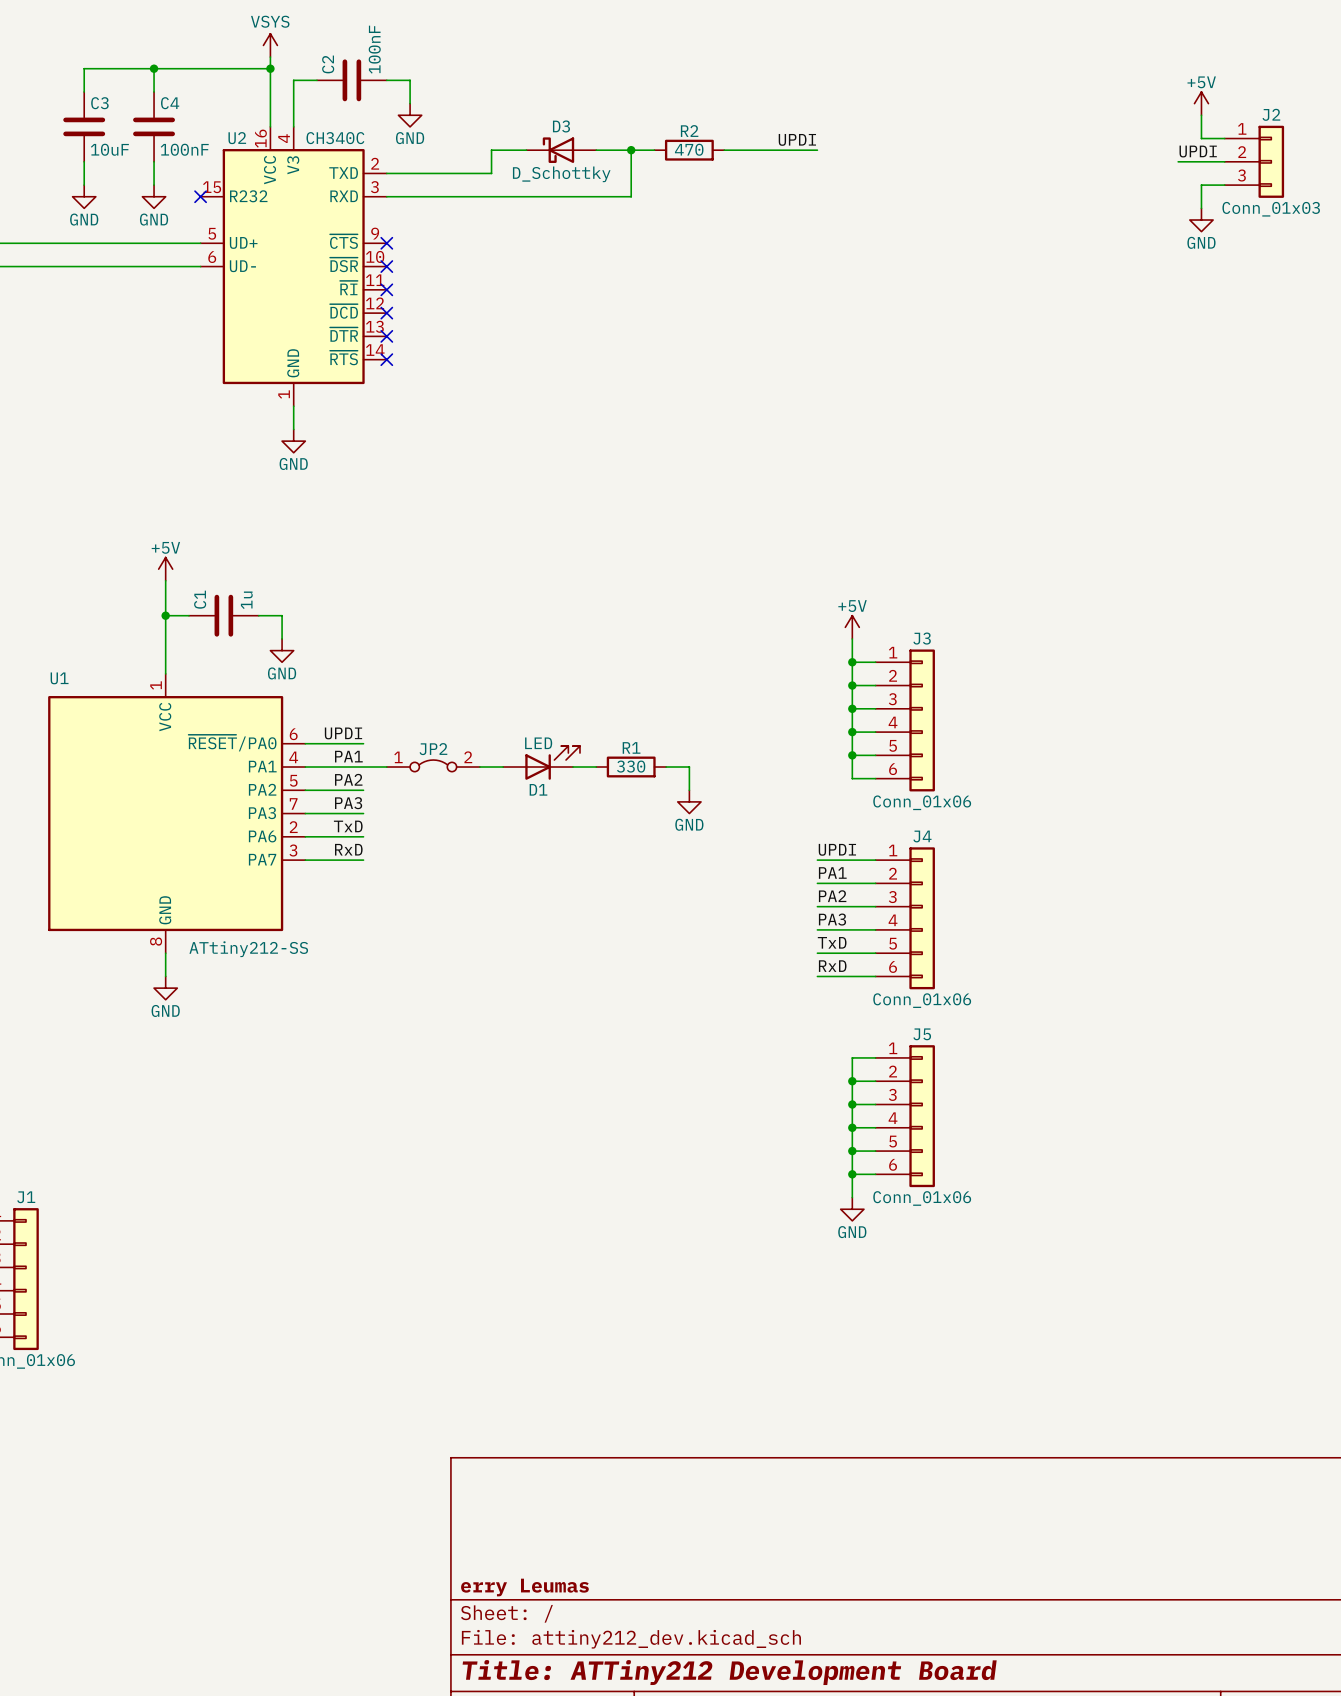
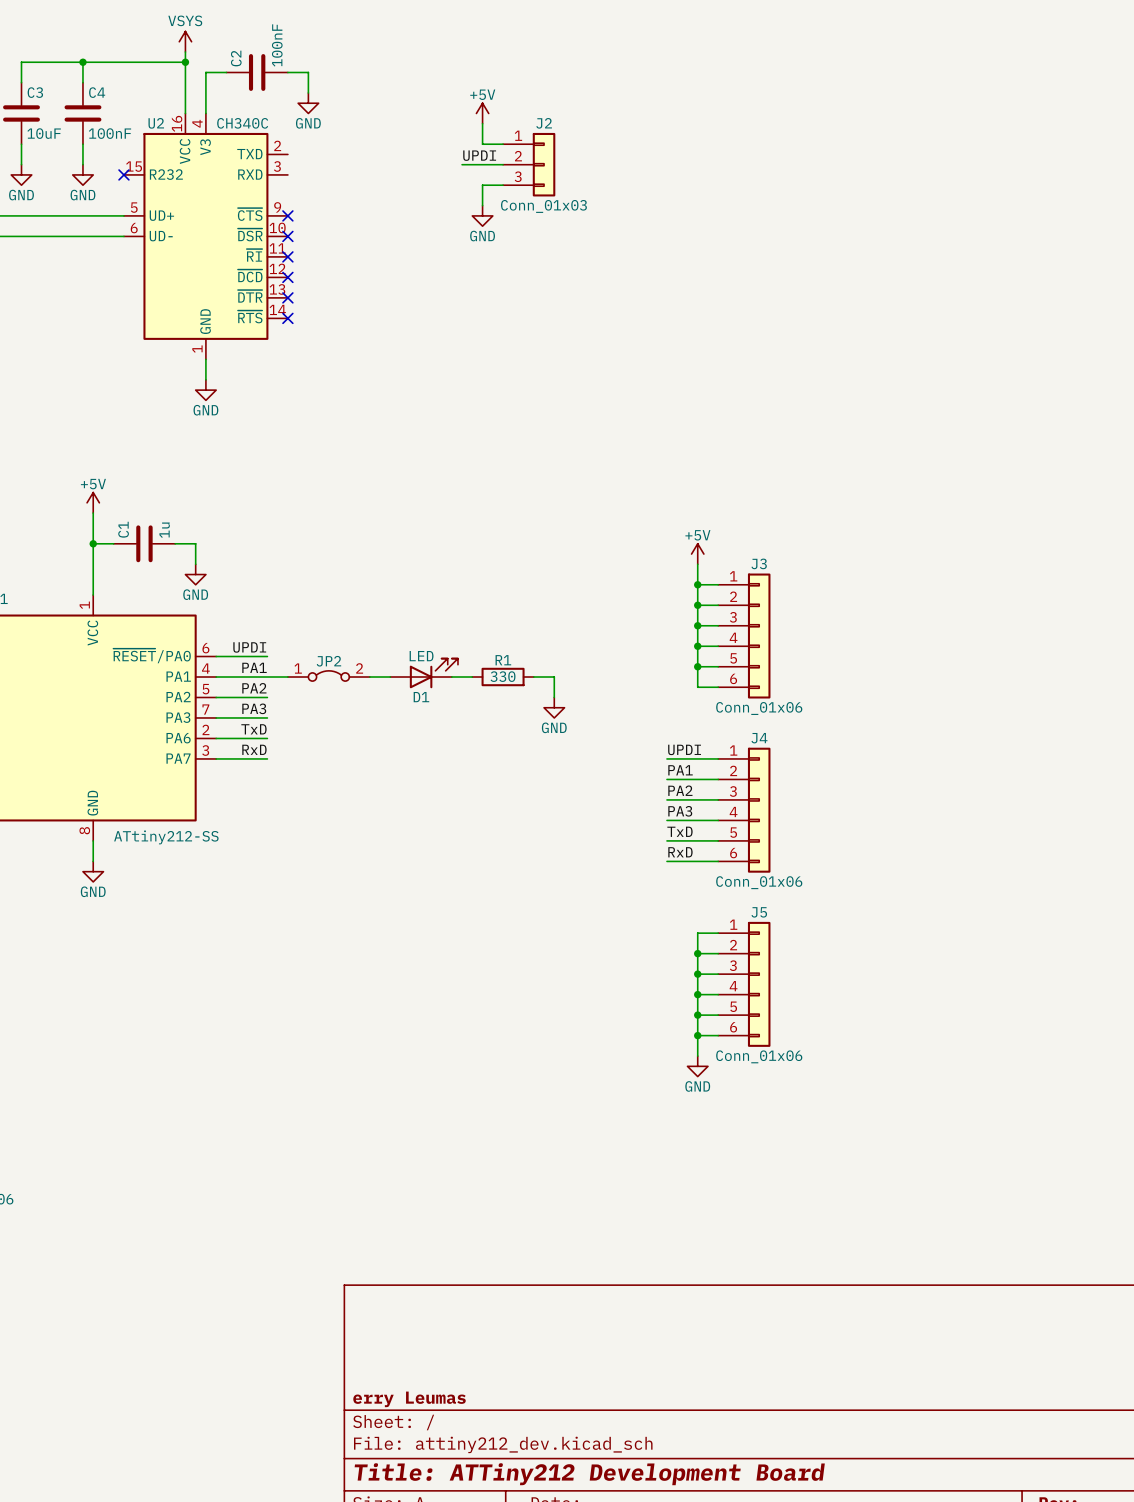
power symbol: +5V (1201, 103) -> none
wire: (1201, 115) (1201, 138) (1224, 138) -> none
power symbol: none -> +5V (482, 113)
wire: none -> (482, 123) (482, 144) (503, 144)
label: UPDI (797, 139) -> none
wire: (526, 150) (491, 150) (491, 173) (386, 173) -> none
D3: D_Schottky (561, 150) -> none
wire: (596, 150) (654, 150) -> none
wire: (631, 150) (631, 196) (386, 196) -> none
junction: (631, 150) -> none
R2: 470 (689, 150) -> none
wire: (724, 150) (817, 150) -> none
label: UPDI (1198, 151) -> none
wire: (1178, 161) (1224, 161) -> none
J2 position: (1254, 161) -> (529, 164)
label: none -> UPDI (479, 155)
wire: none -> (462, 164) (503, 164)
wire: (1224, 185) (1201, 185) (1201, 208) -> none
wire: none -> (503, 185) (482, 185) (482, 205)
power symbol: GND (1201, 220) -> none
power symbol: none -> GND (482, 215)

